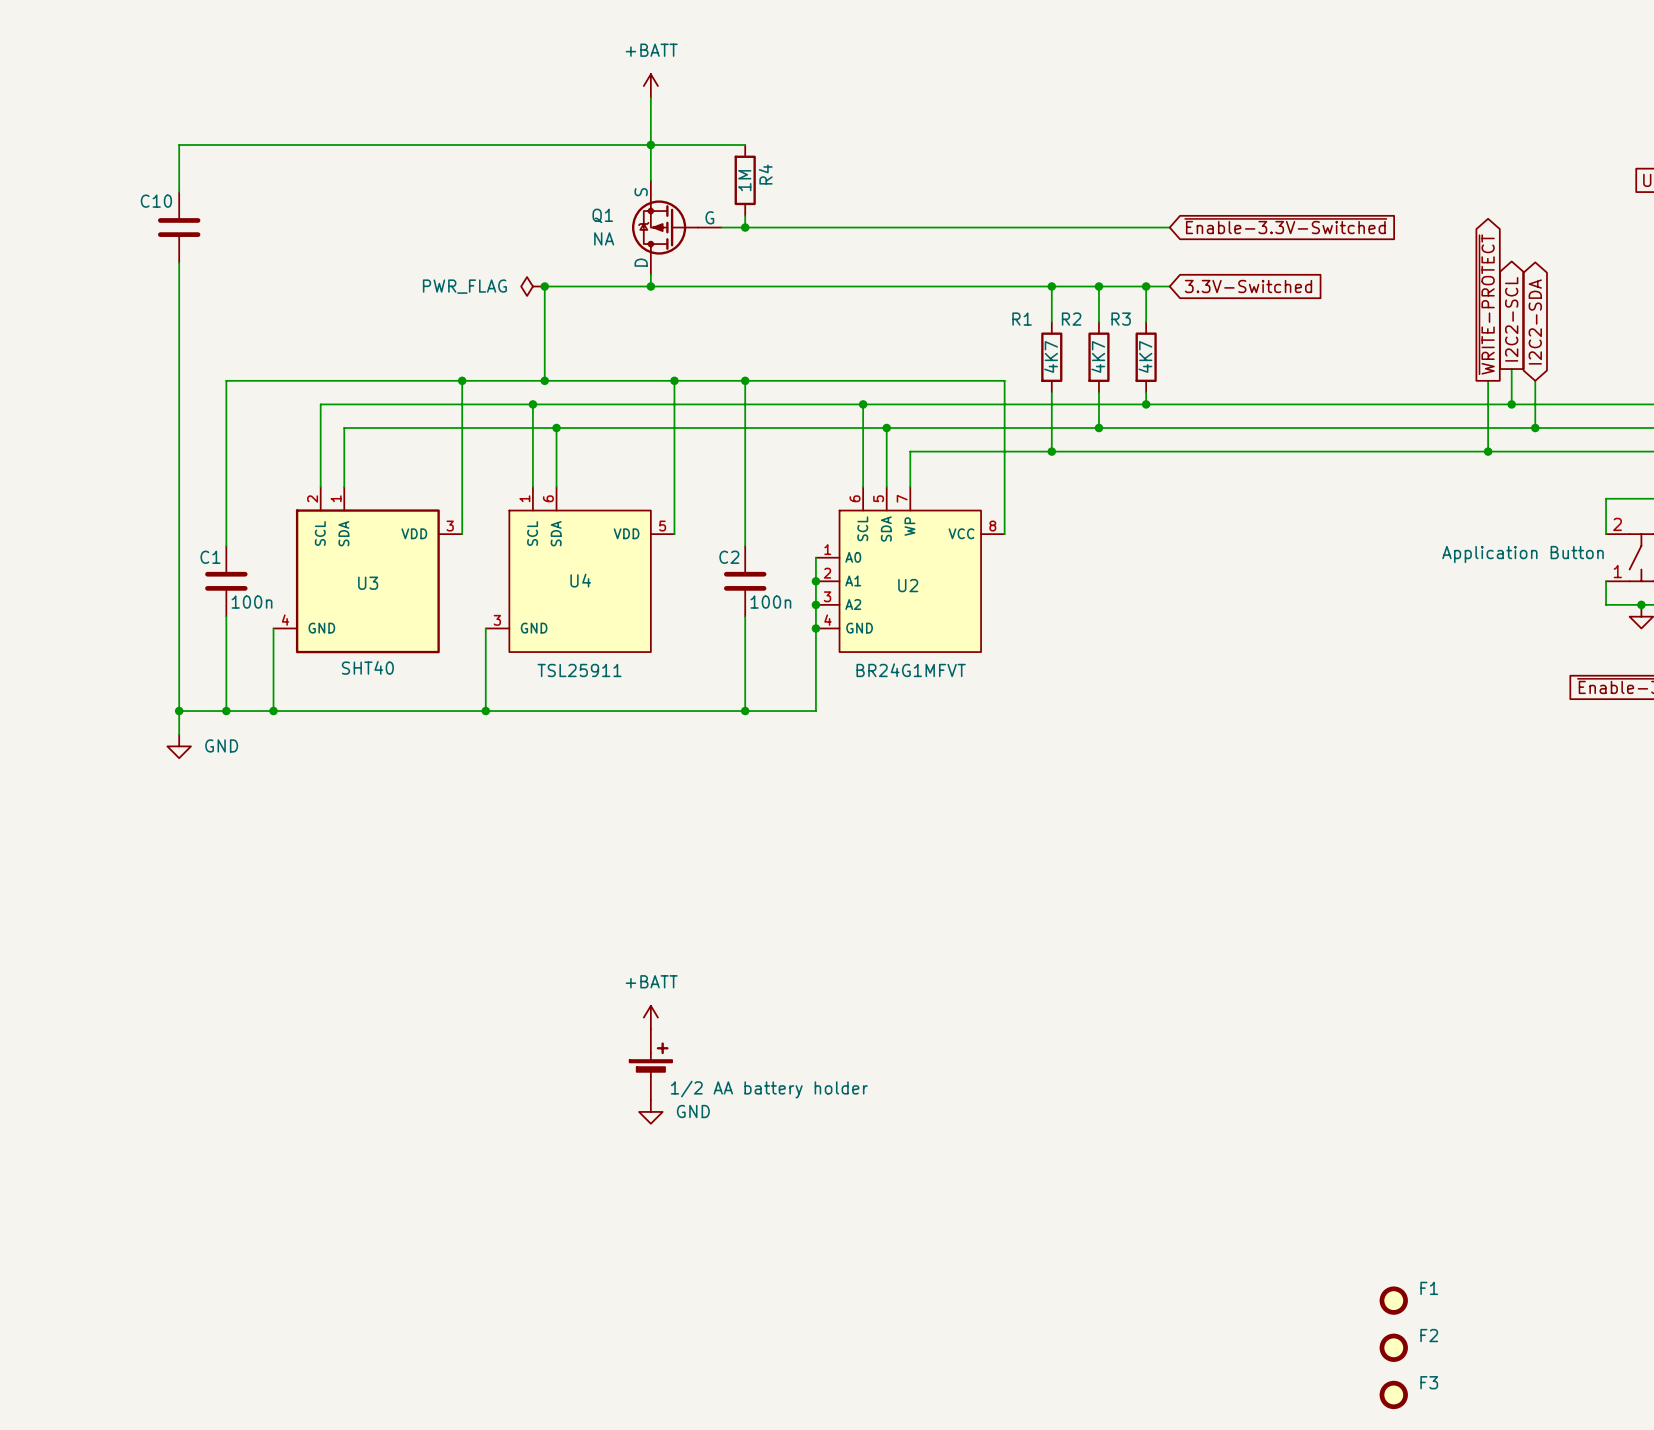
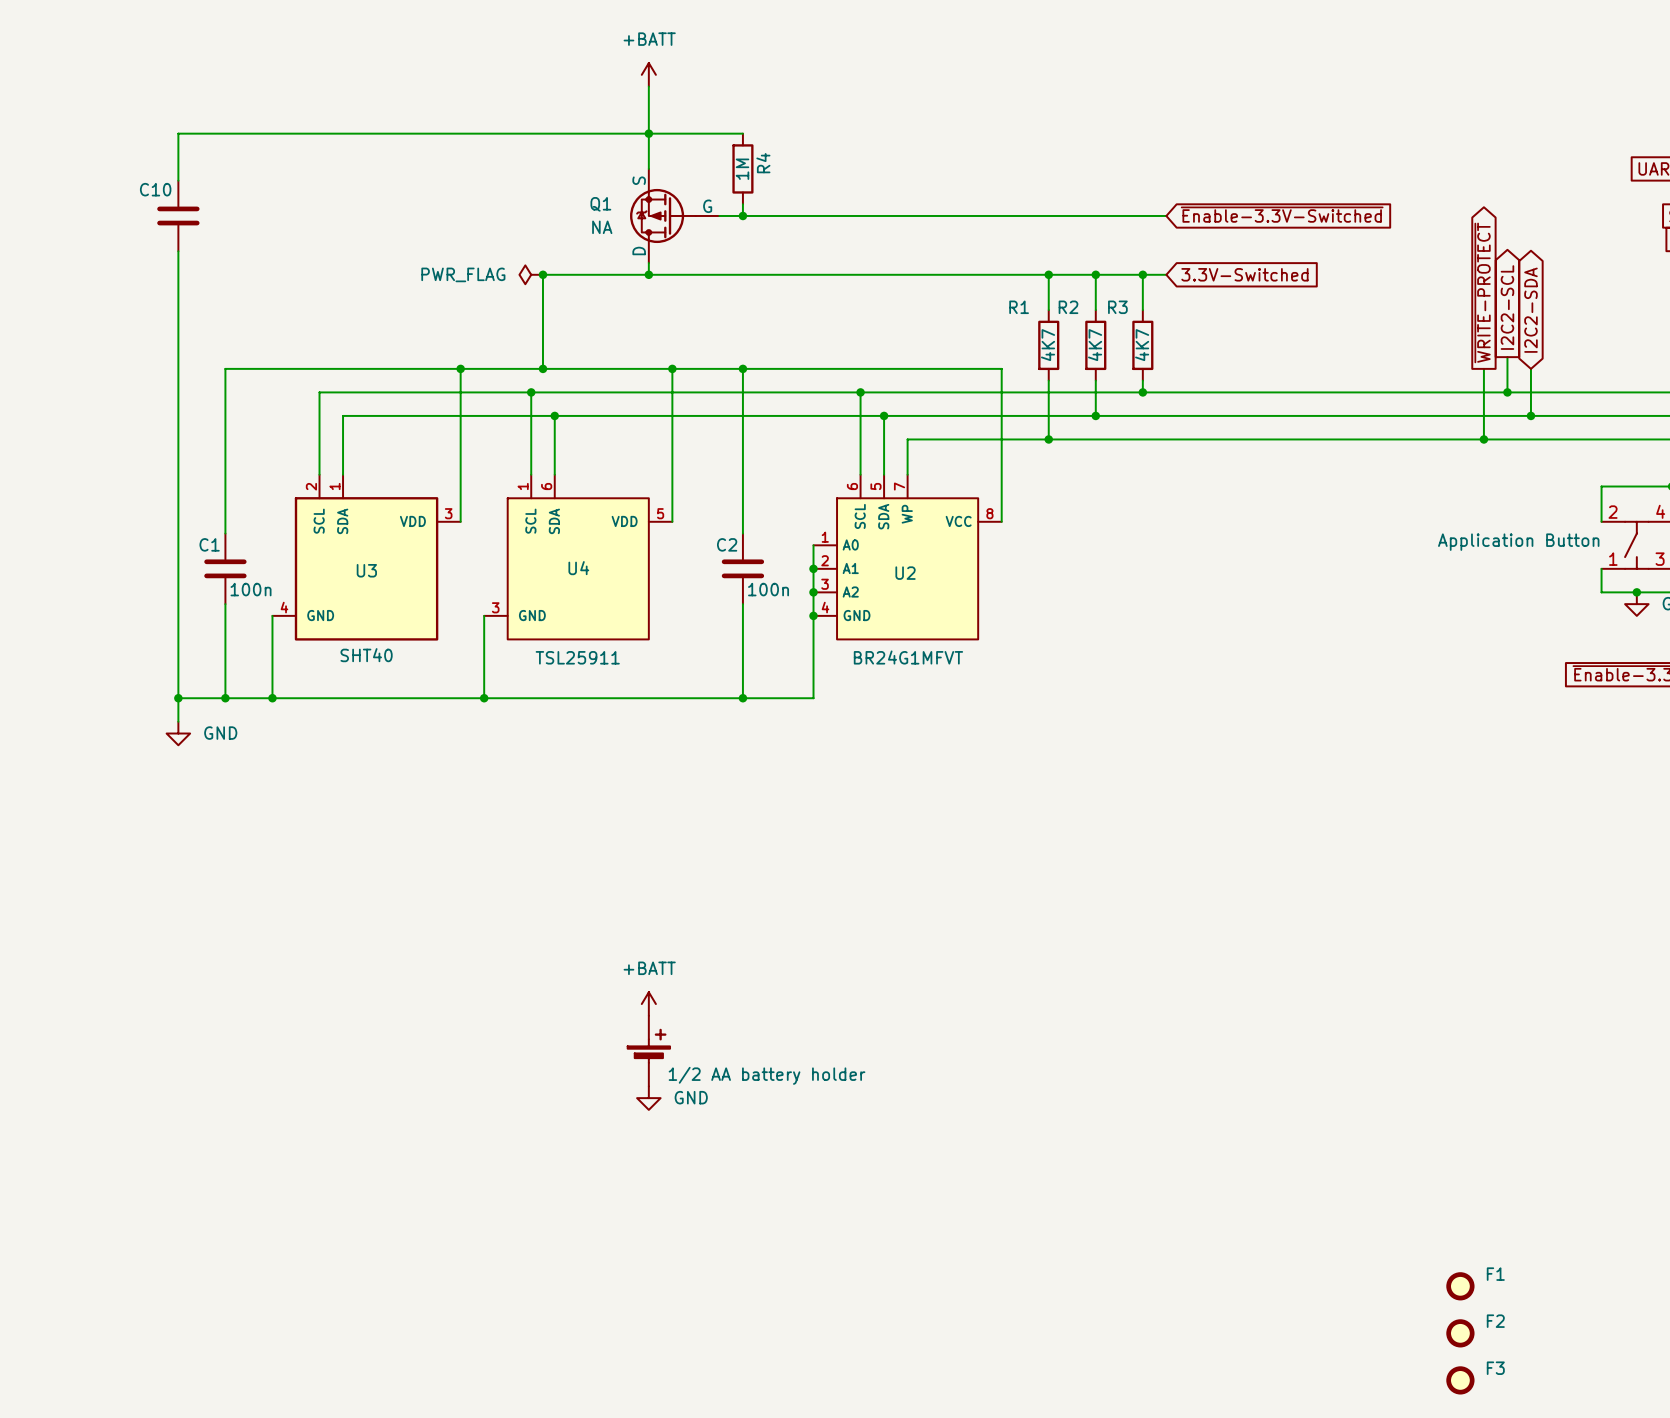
F1 position: (1393, 1300) -> (1460, 1286)
F2 position: (1393, 1347) -> (1460, 1333)
F3 position: (1393, 1394) -> (1460, 1380)

